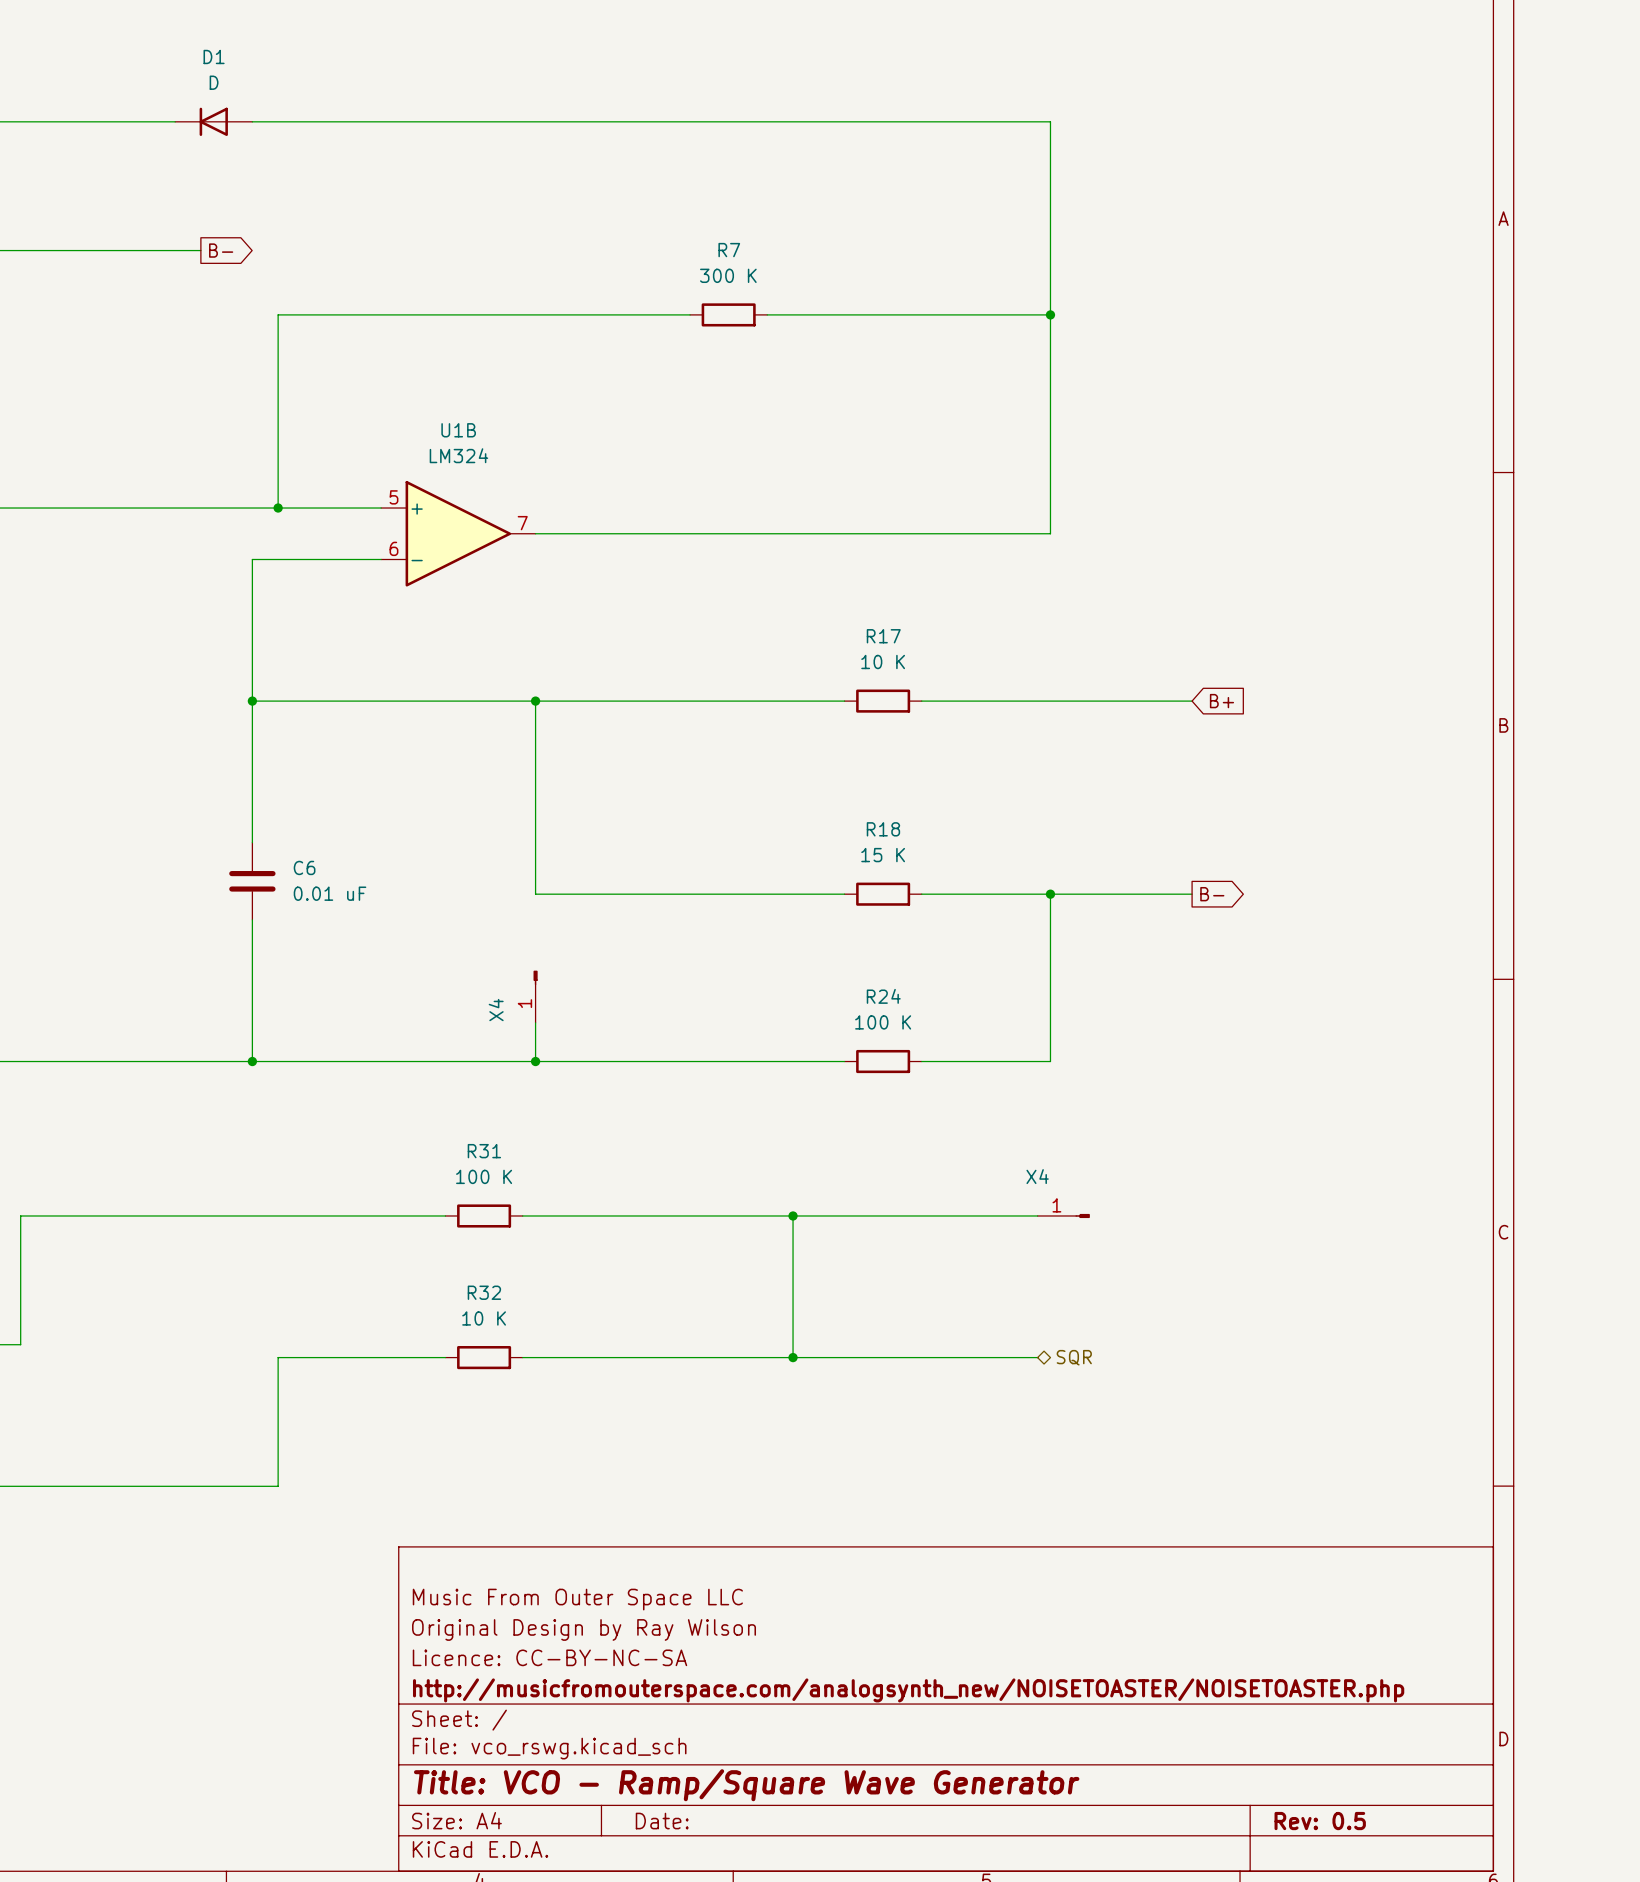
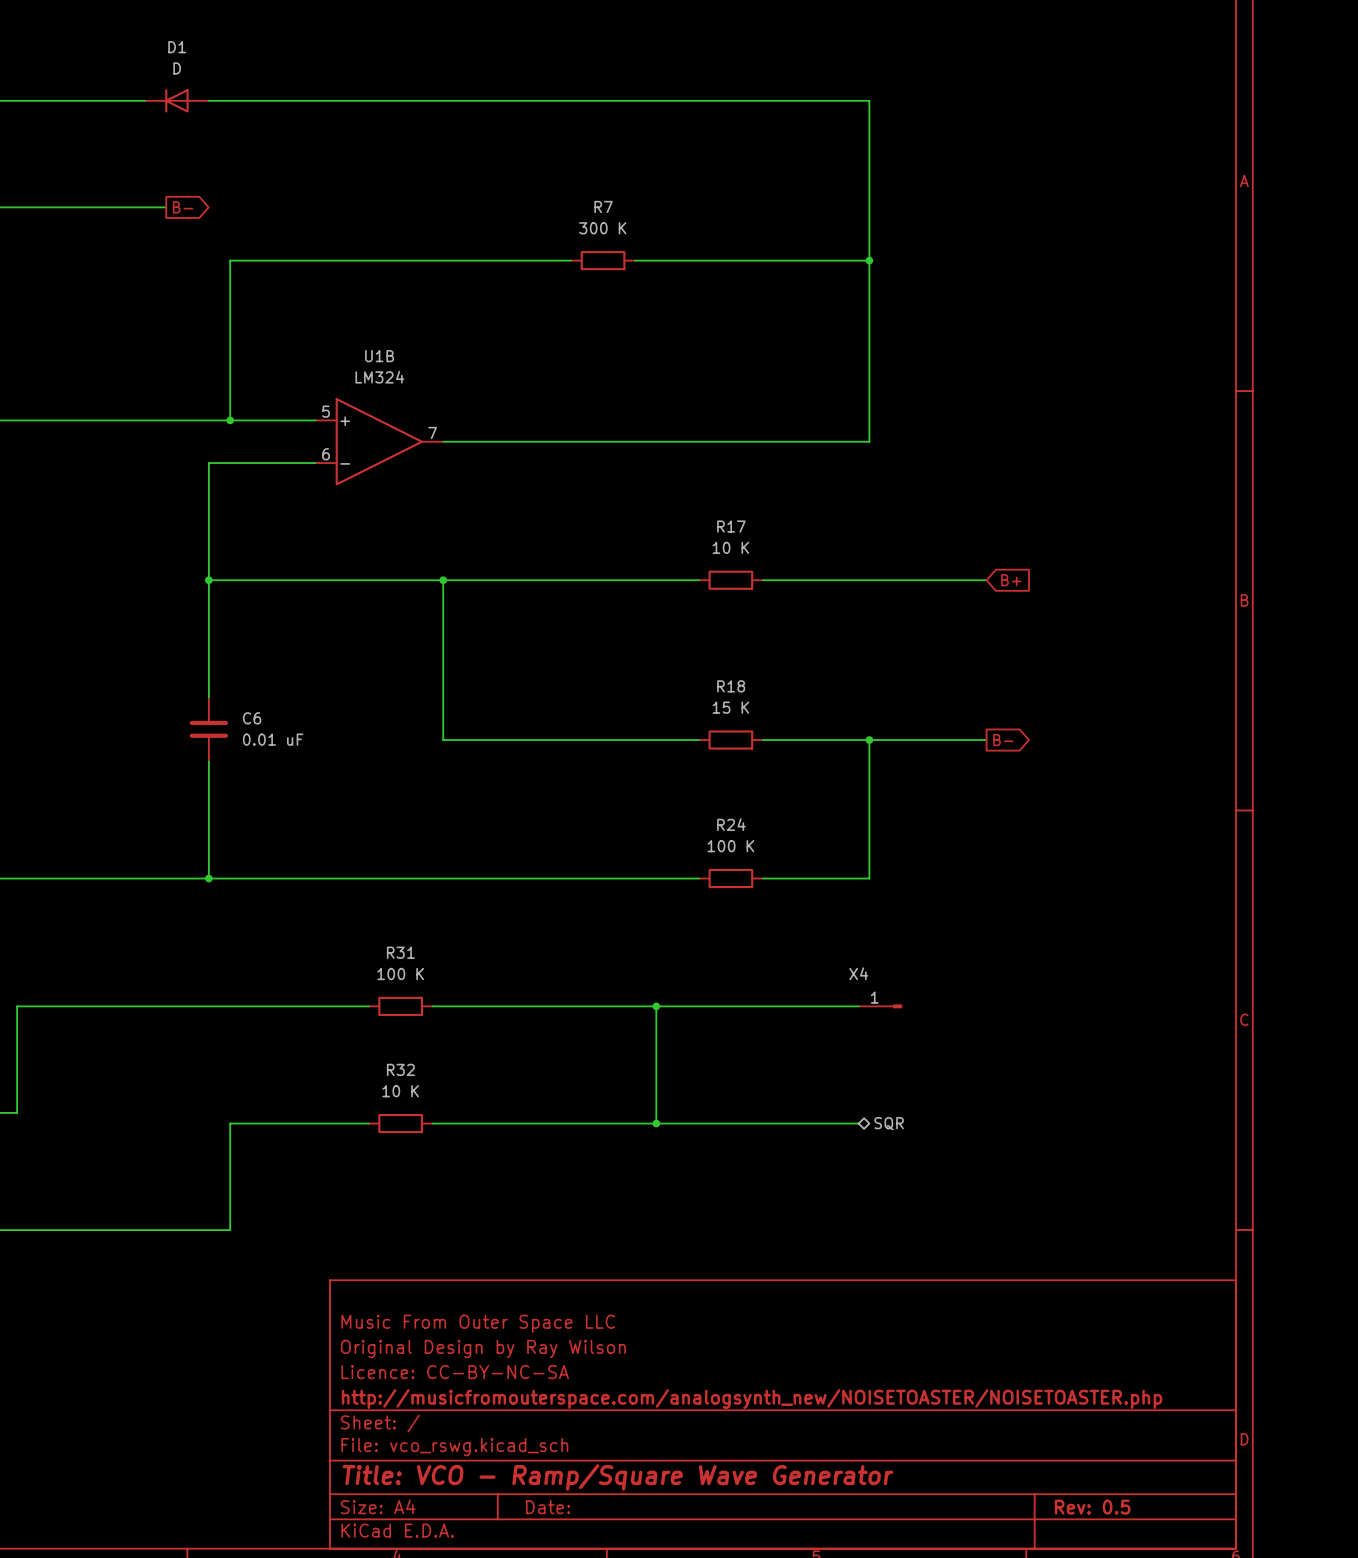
X4: (535, 996) -> none
wire: (535, 1022) (535, 1061) -> none
junction: (535, 1061) -> none

